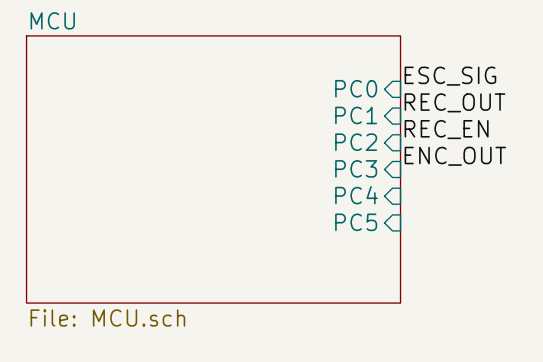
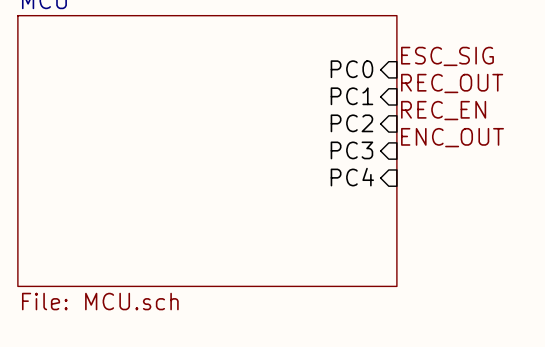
sheet pin: PC5 (356, 222) -> none

